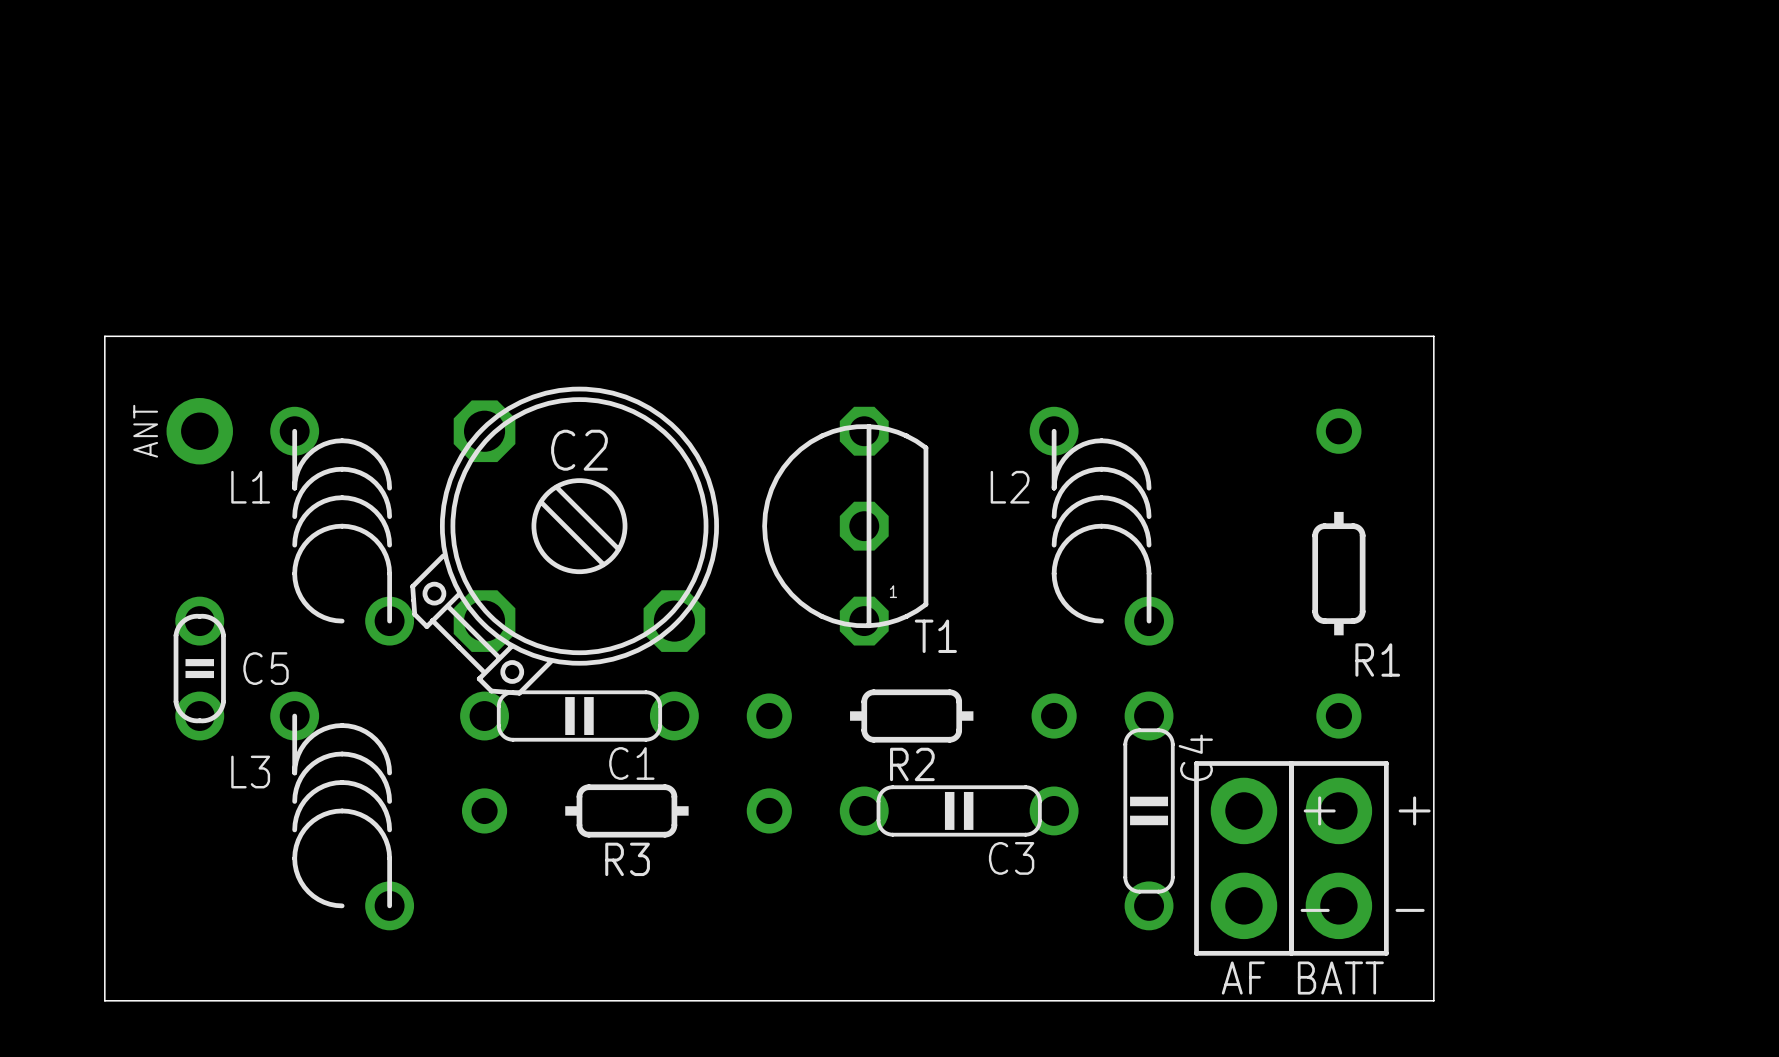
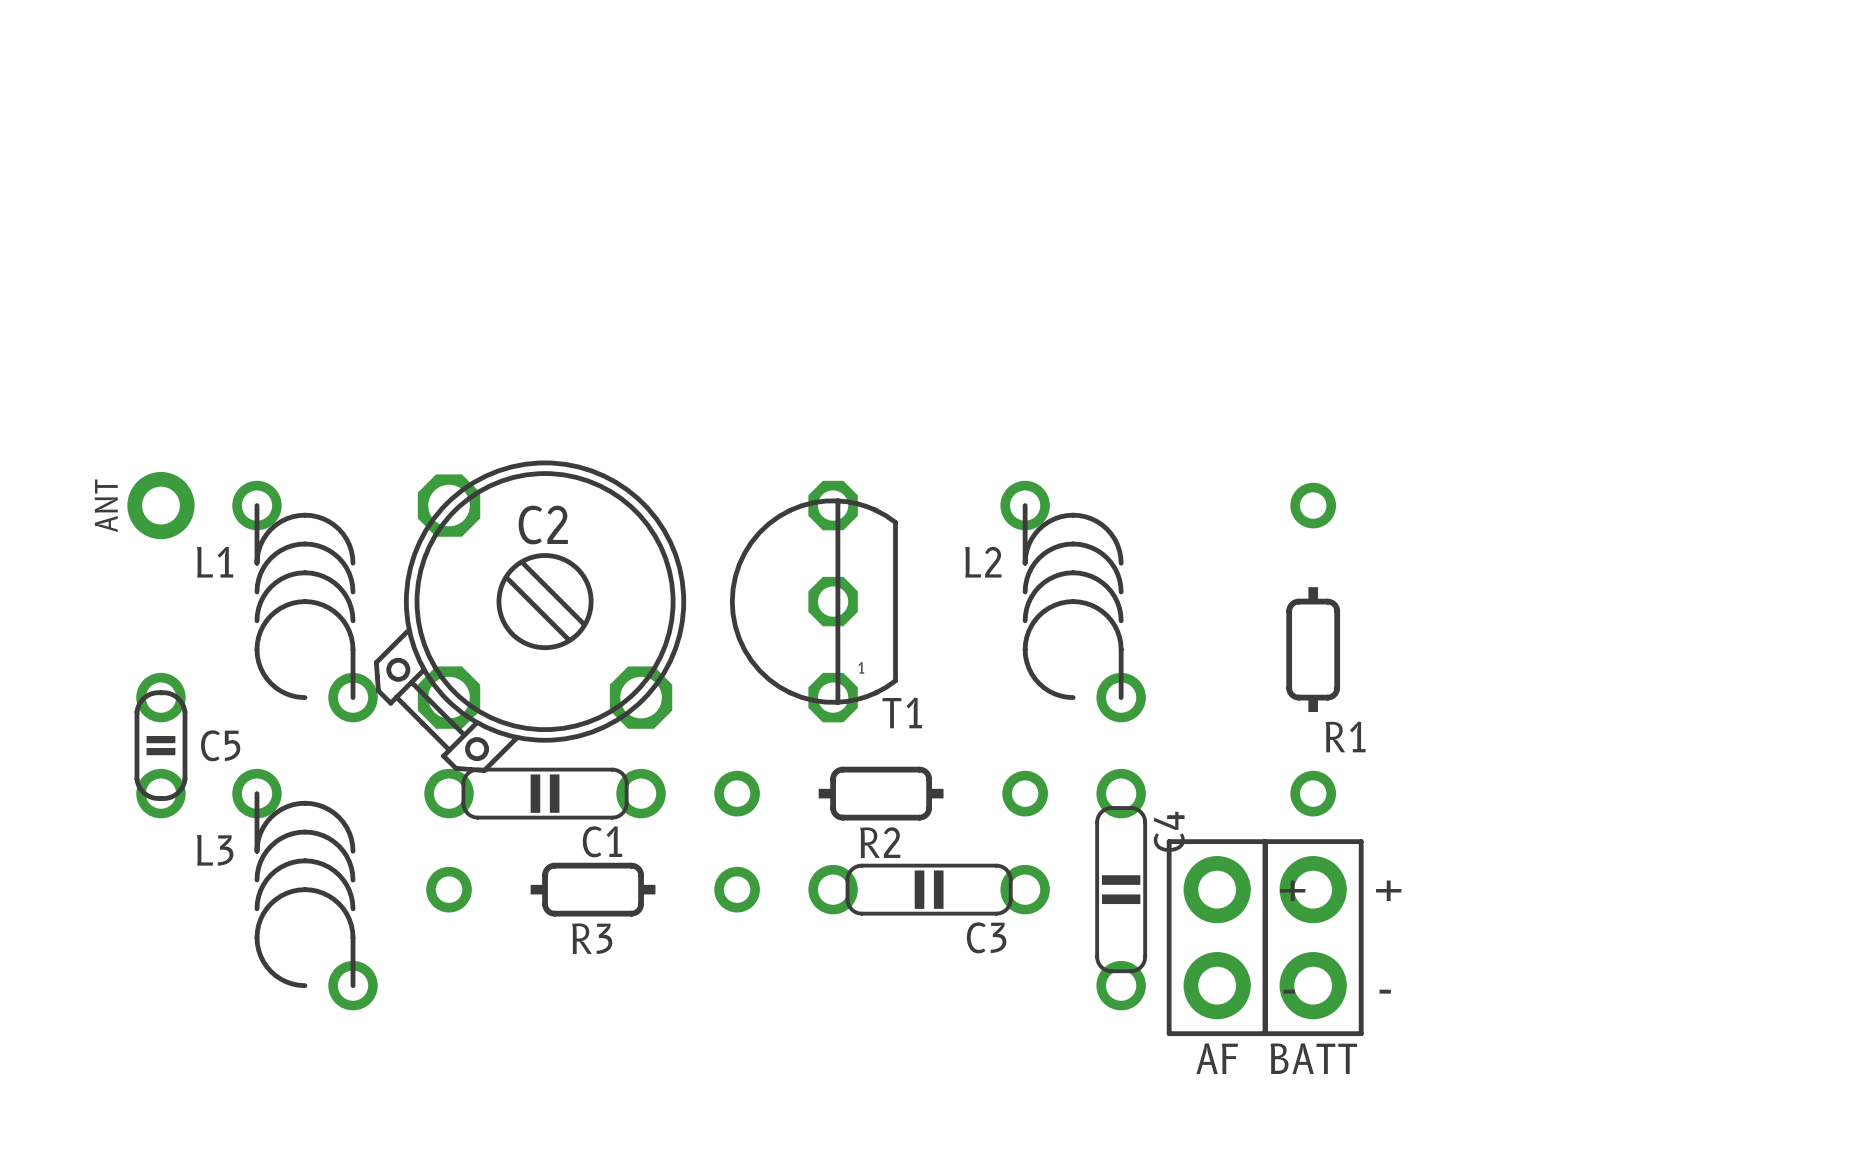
board edge: (104, 336) (1433, 336) (1433, 1000) (104, 1000) (104, 336) -> none

